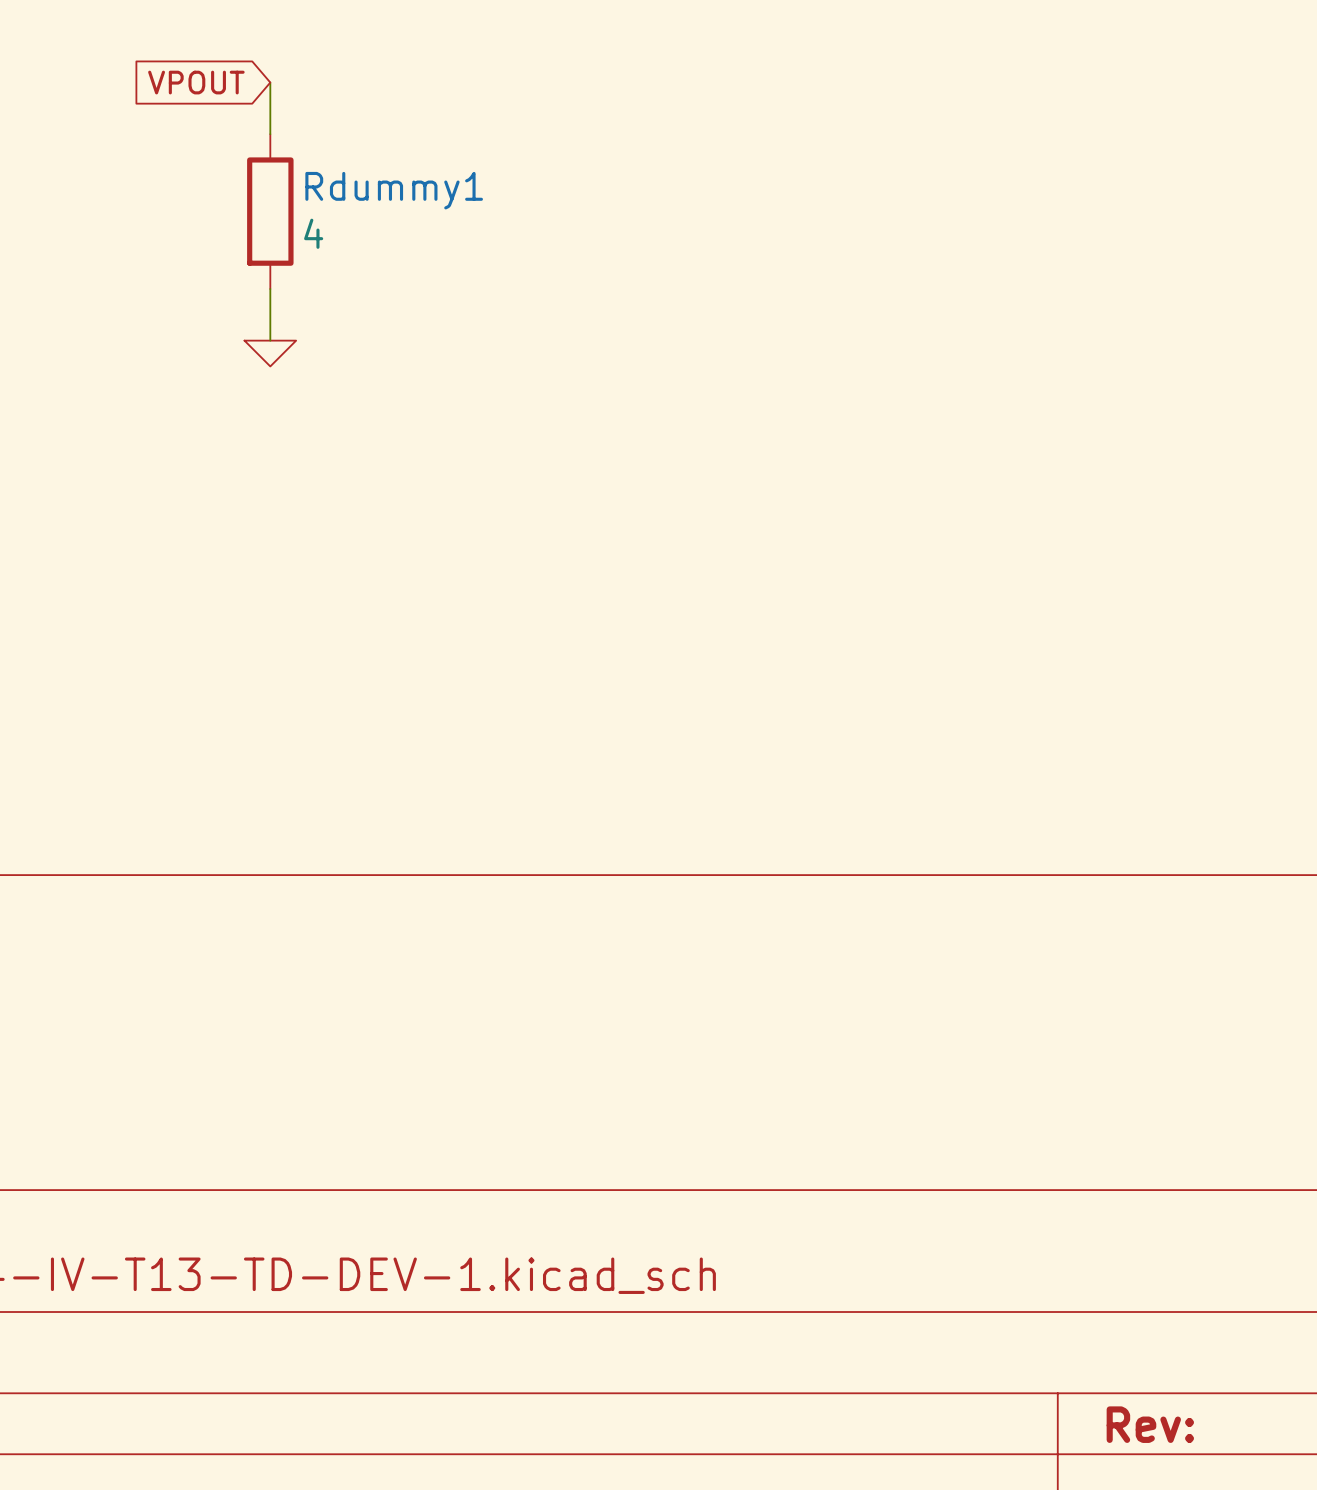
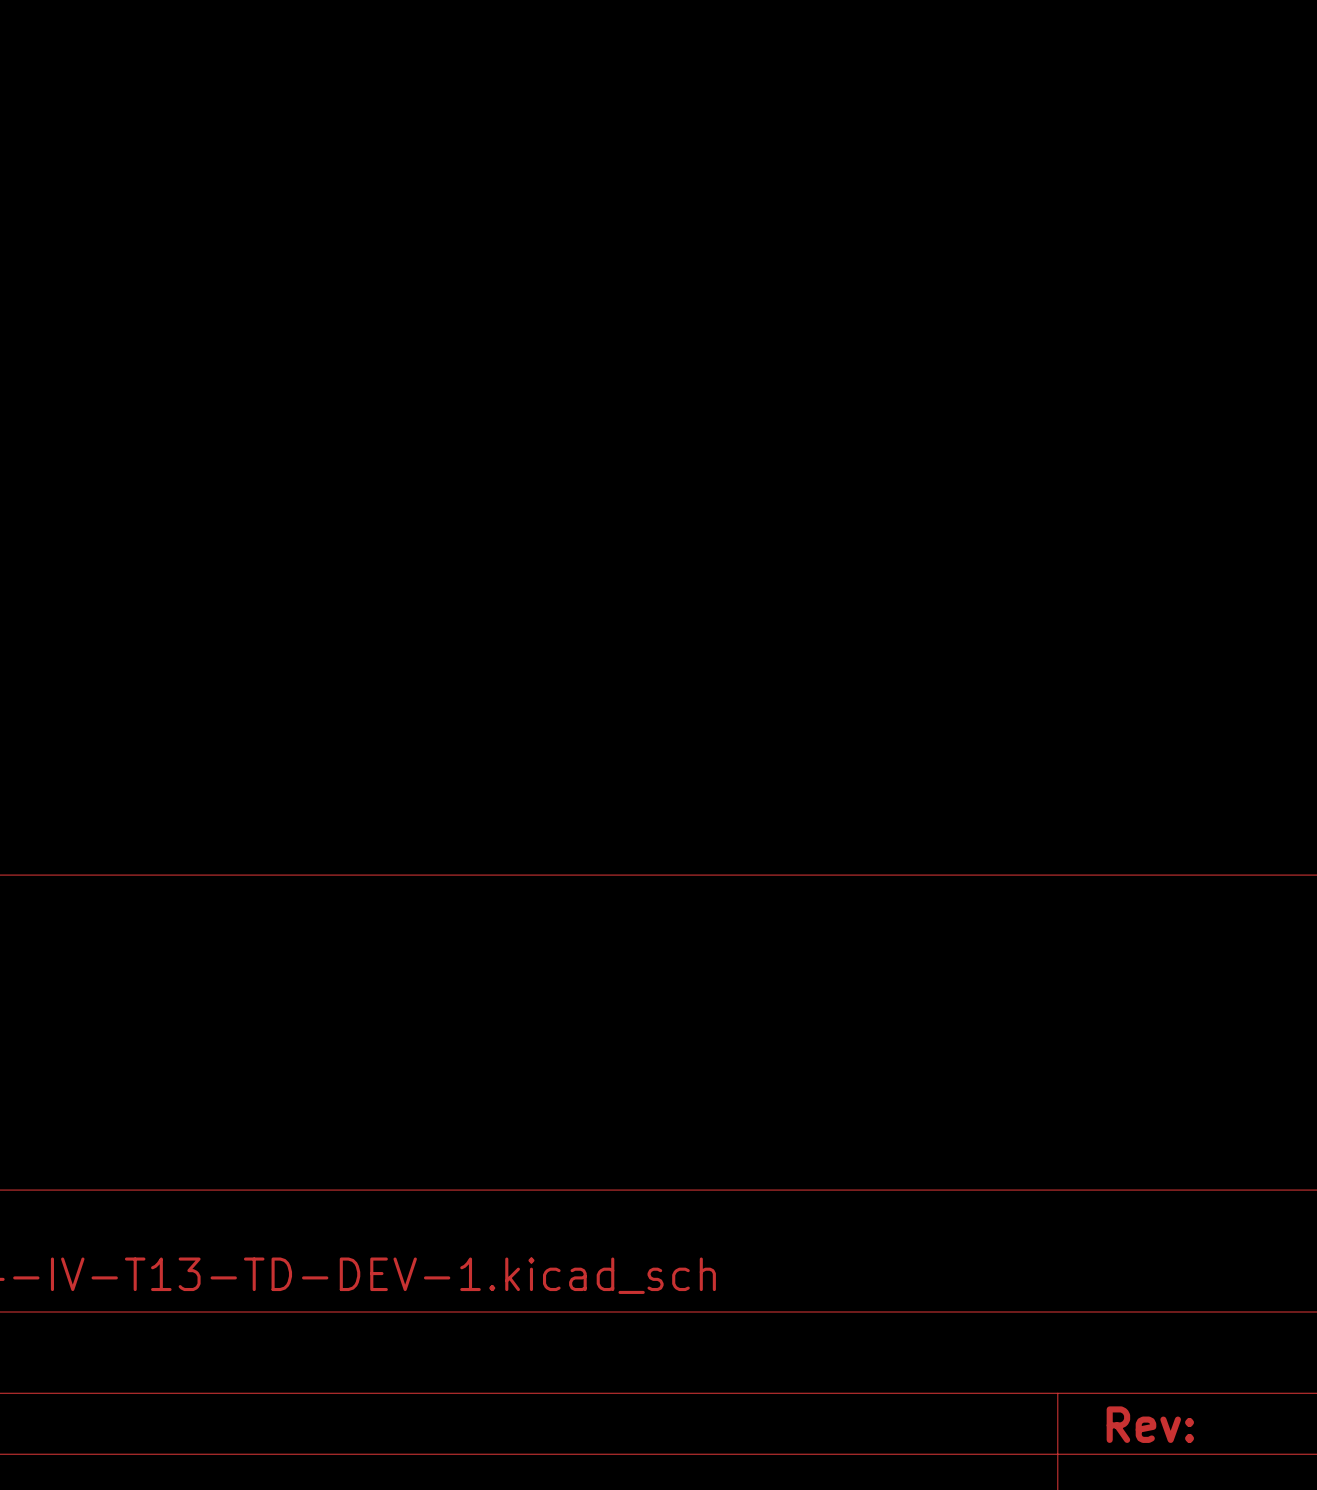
global label: VPOUT (196, 82) -> none
wire: (270, 82) (270, 134) -> none
Rdummy1: 4 (270, 211) -> none
wire: (270, 289) (270, 340) -> none
power symbol: (270, 353) -> none

